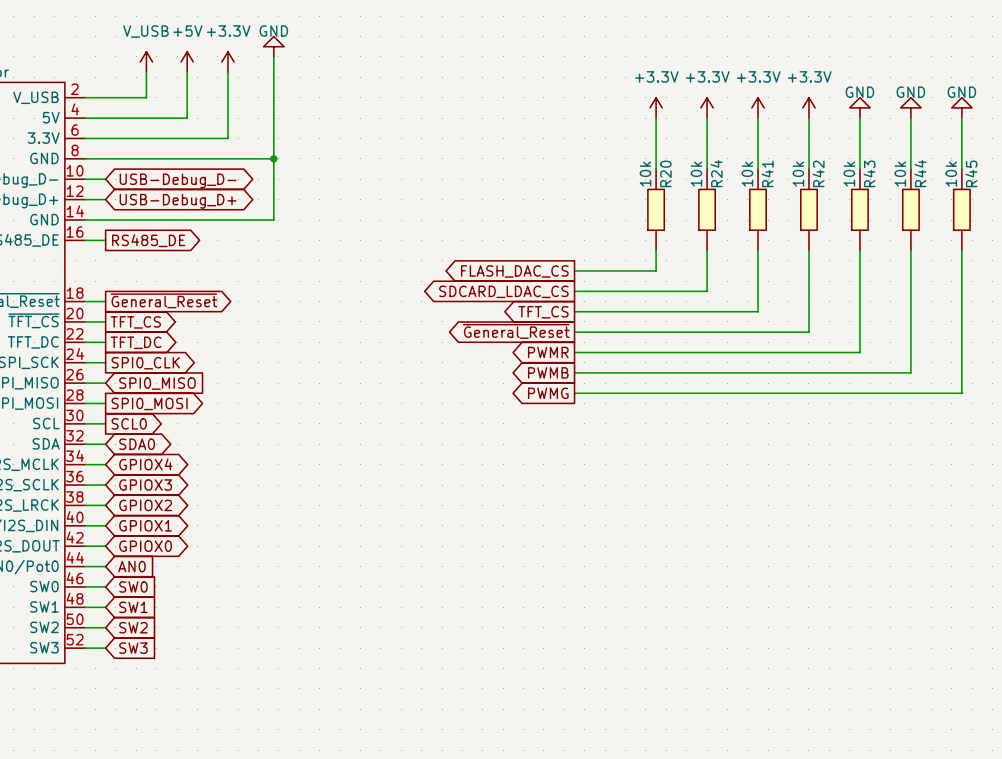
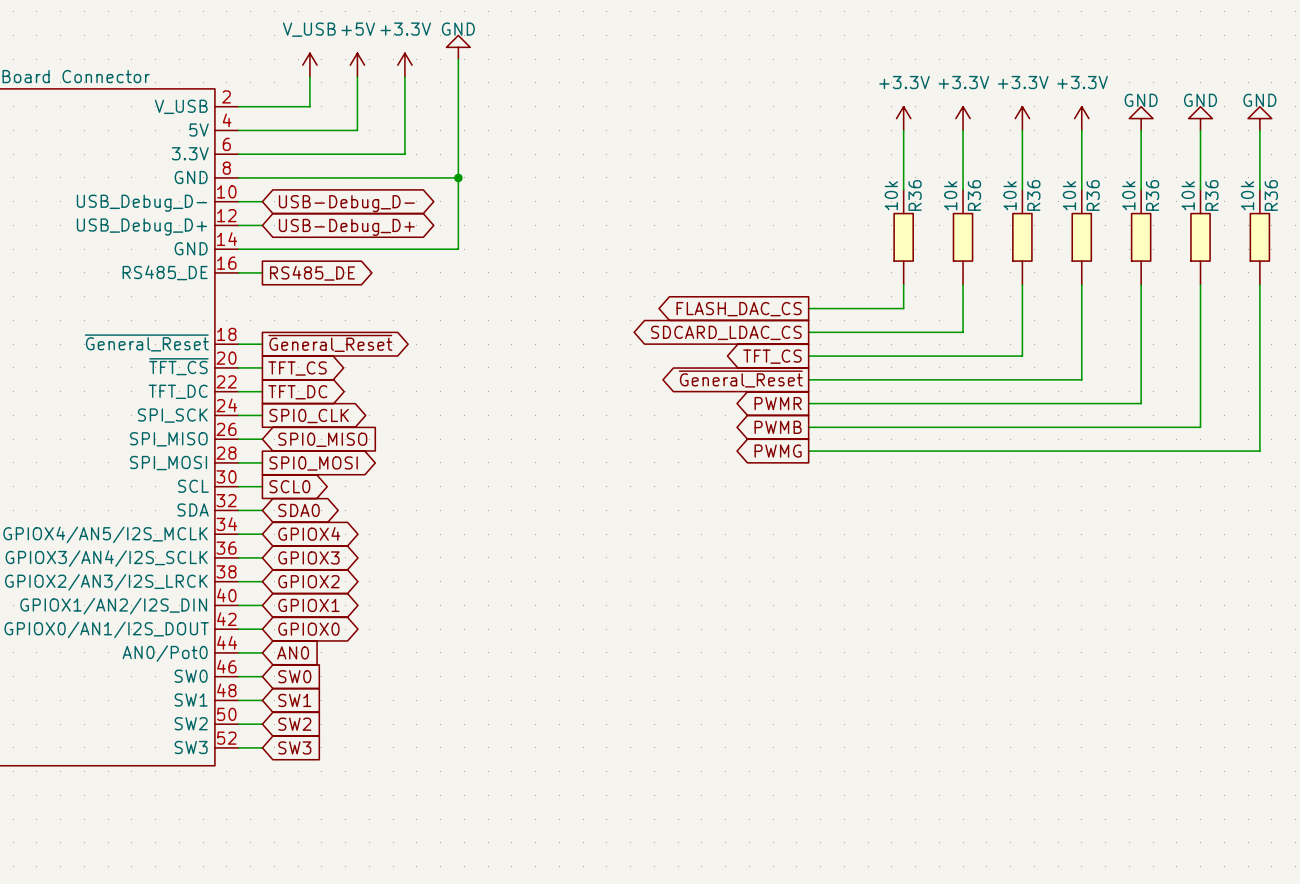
R20 name: R20 (665, 173) -> R36 (915, 195)
R24 name: R24 (716, 173) -> R36 (974, 195)
R41 name: R41 (767, 173) -> R36 (1033, 195)
R42 name: R42 (818, 173) -> R36 (1093, 195)
R43 name: R43 (869, 173) -> R36 (1152, 195)
R44 name: R44 (920, 173) -> R36 (1211, 195)
R45 name: R45 (971, 173) -> R36 (1271, 195)

